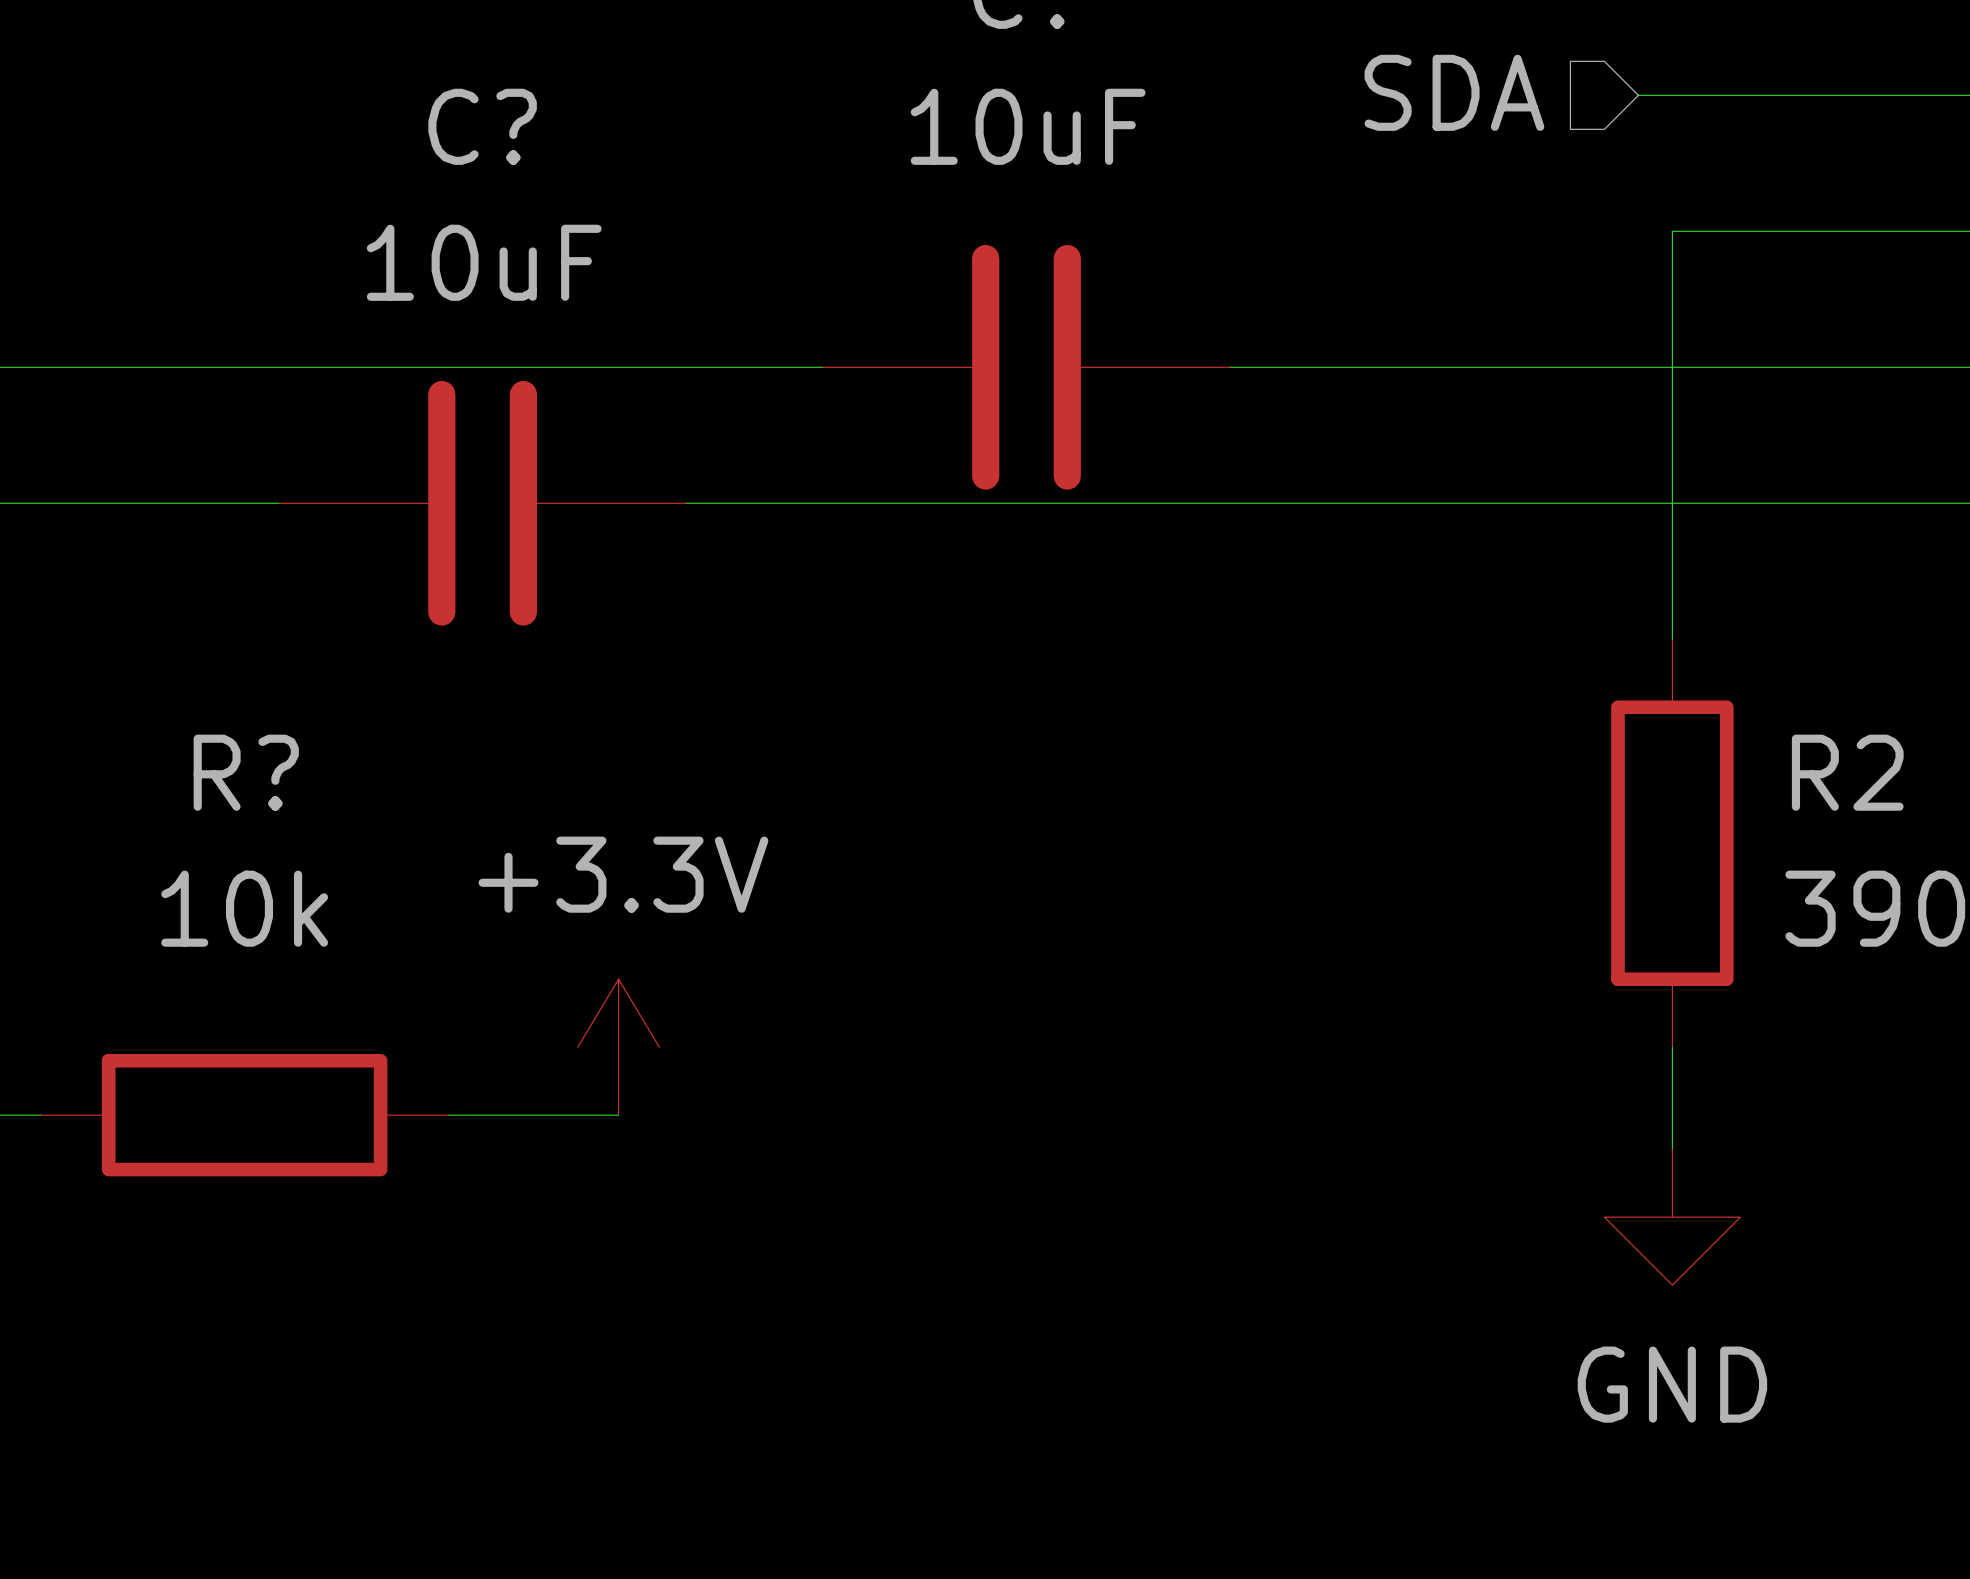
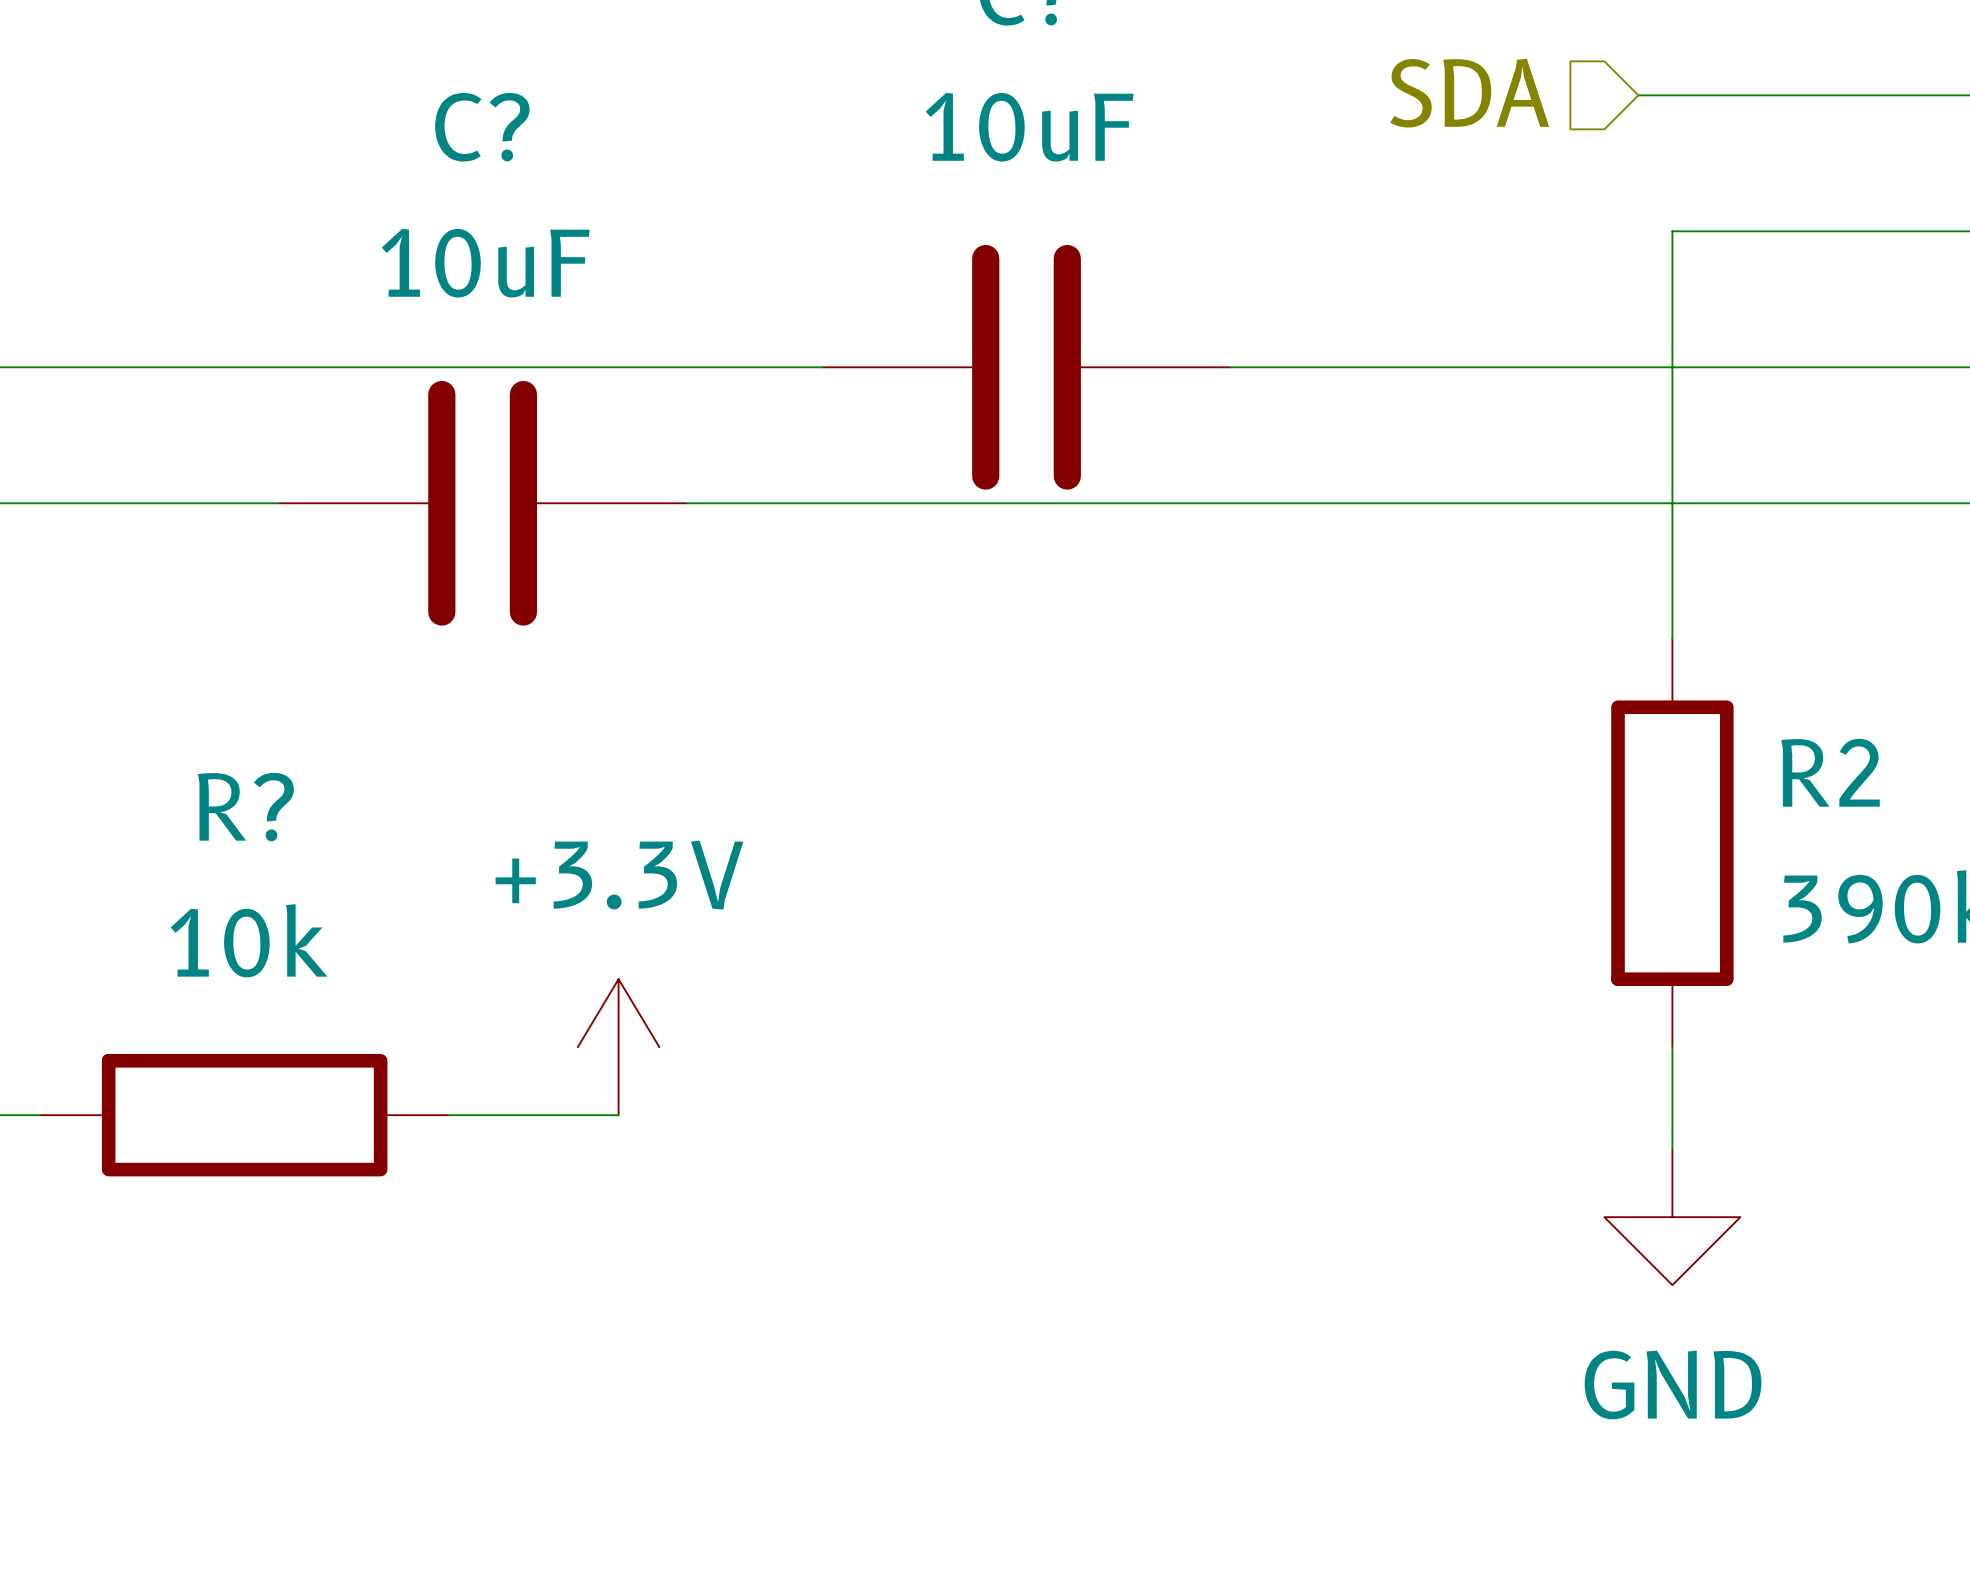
R? name position: R? (246, 772) -> R? (245, 807)
R? value position: 10k (244, 908) -> 10k (249, 940)

